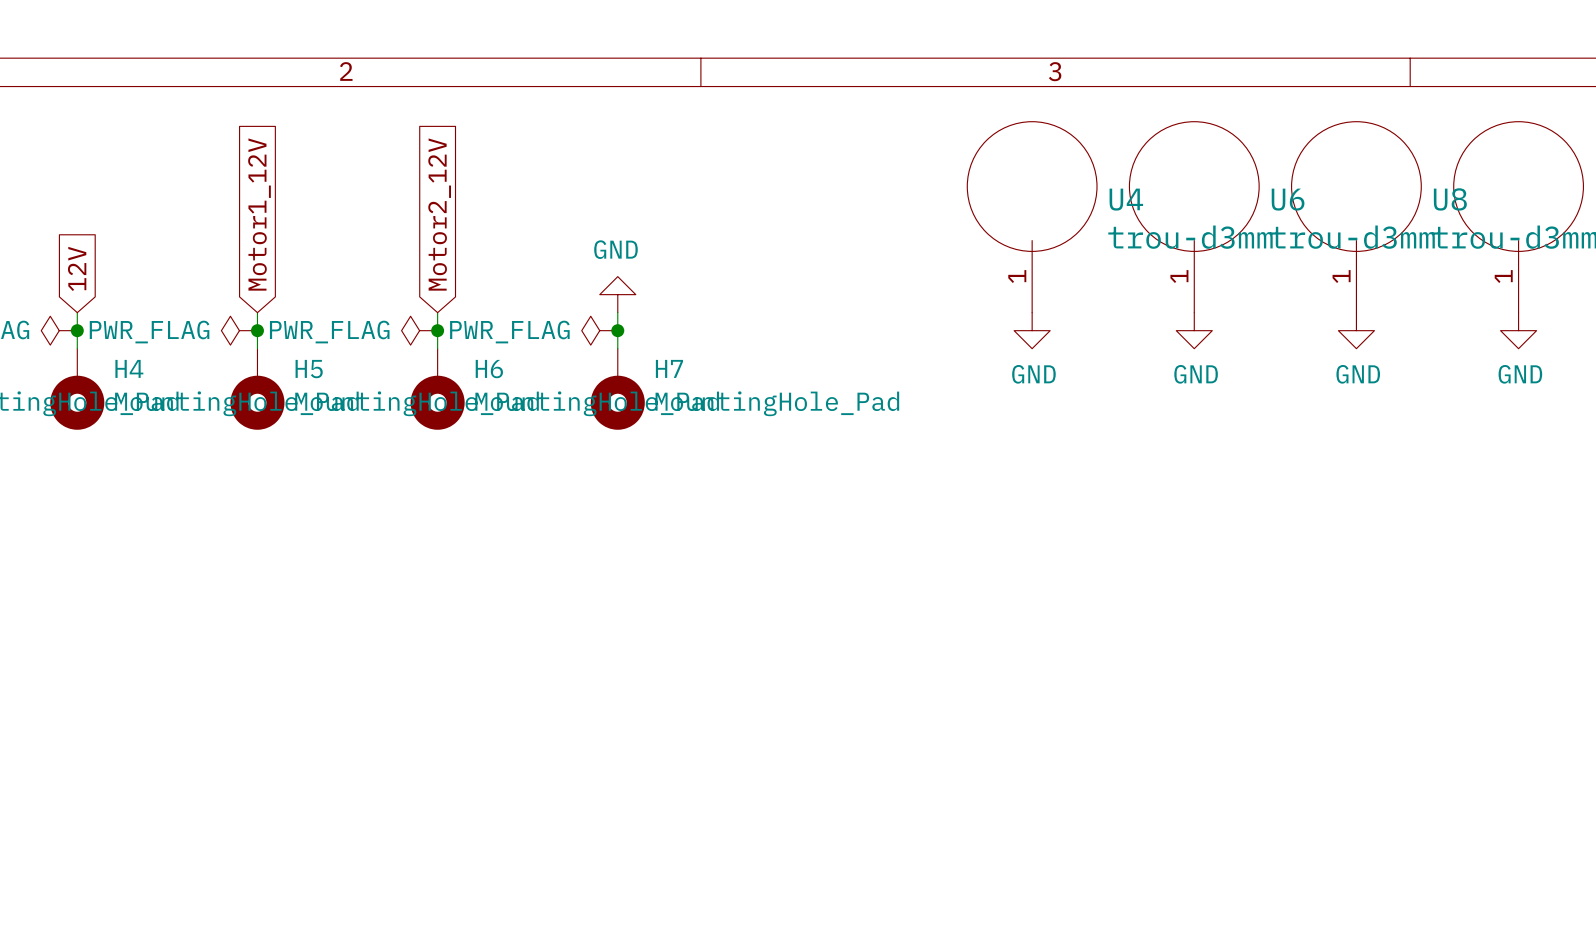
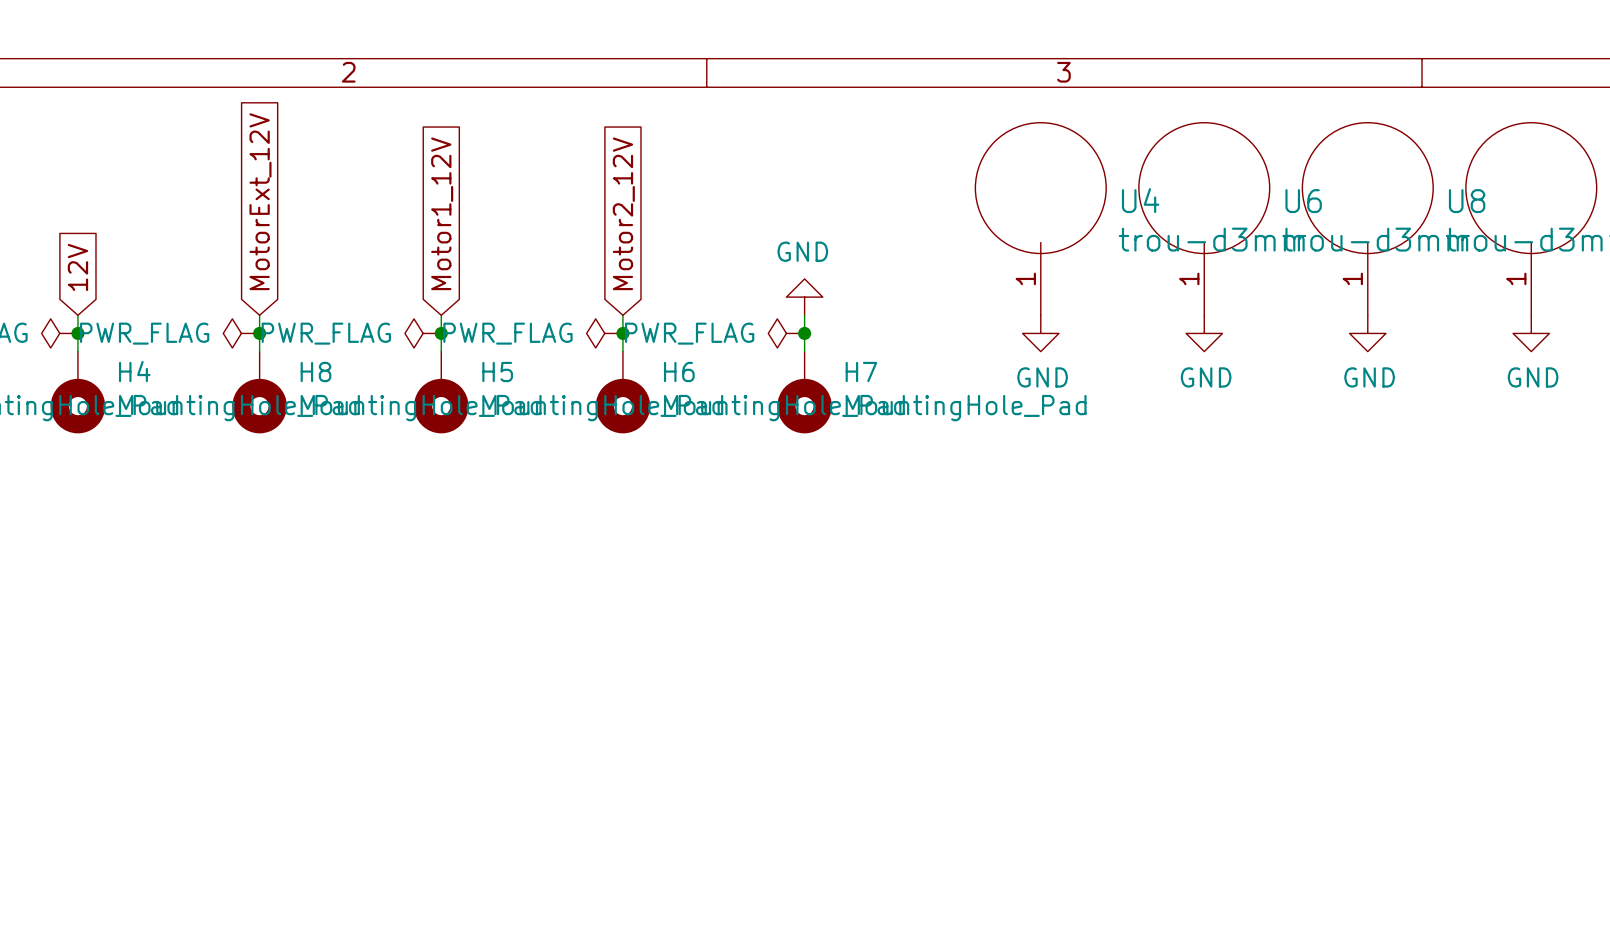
global label: Motor1_12V (259, 214) -> MotorExt_12V (260, 201)
global label: Motor2_12V (439, 214) -> Motor1_12V (442, 213)
global label: none -> Motor2_12V (623, 213)
power symbol position: GND (617, 294) -> GND (804, 297)
wire: none -> (804, 315) (804, 351)
power symbol: none -> PWR_FLAG (786, 333)
junction: none -> (804, 333)
H7 name: H7 (669, 368) -> H6 (679, 372)
H5 name: H5 (309, 369) -> H8 (315, 372)
H6 name: H6 (489, 369) -> H5 (497, 372)
H7: none -> MountingHole_Pad (804, 392)

